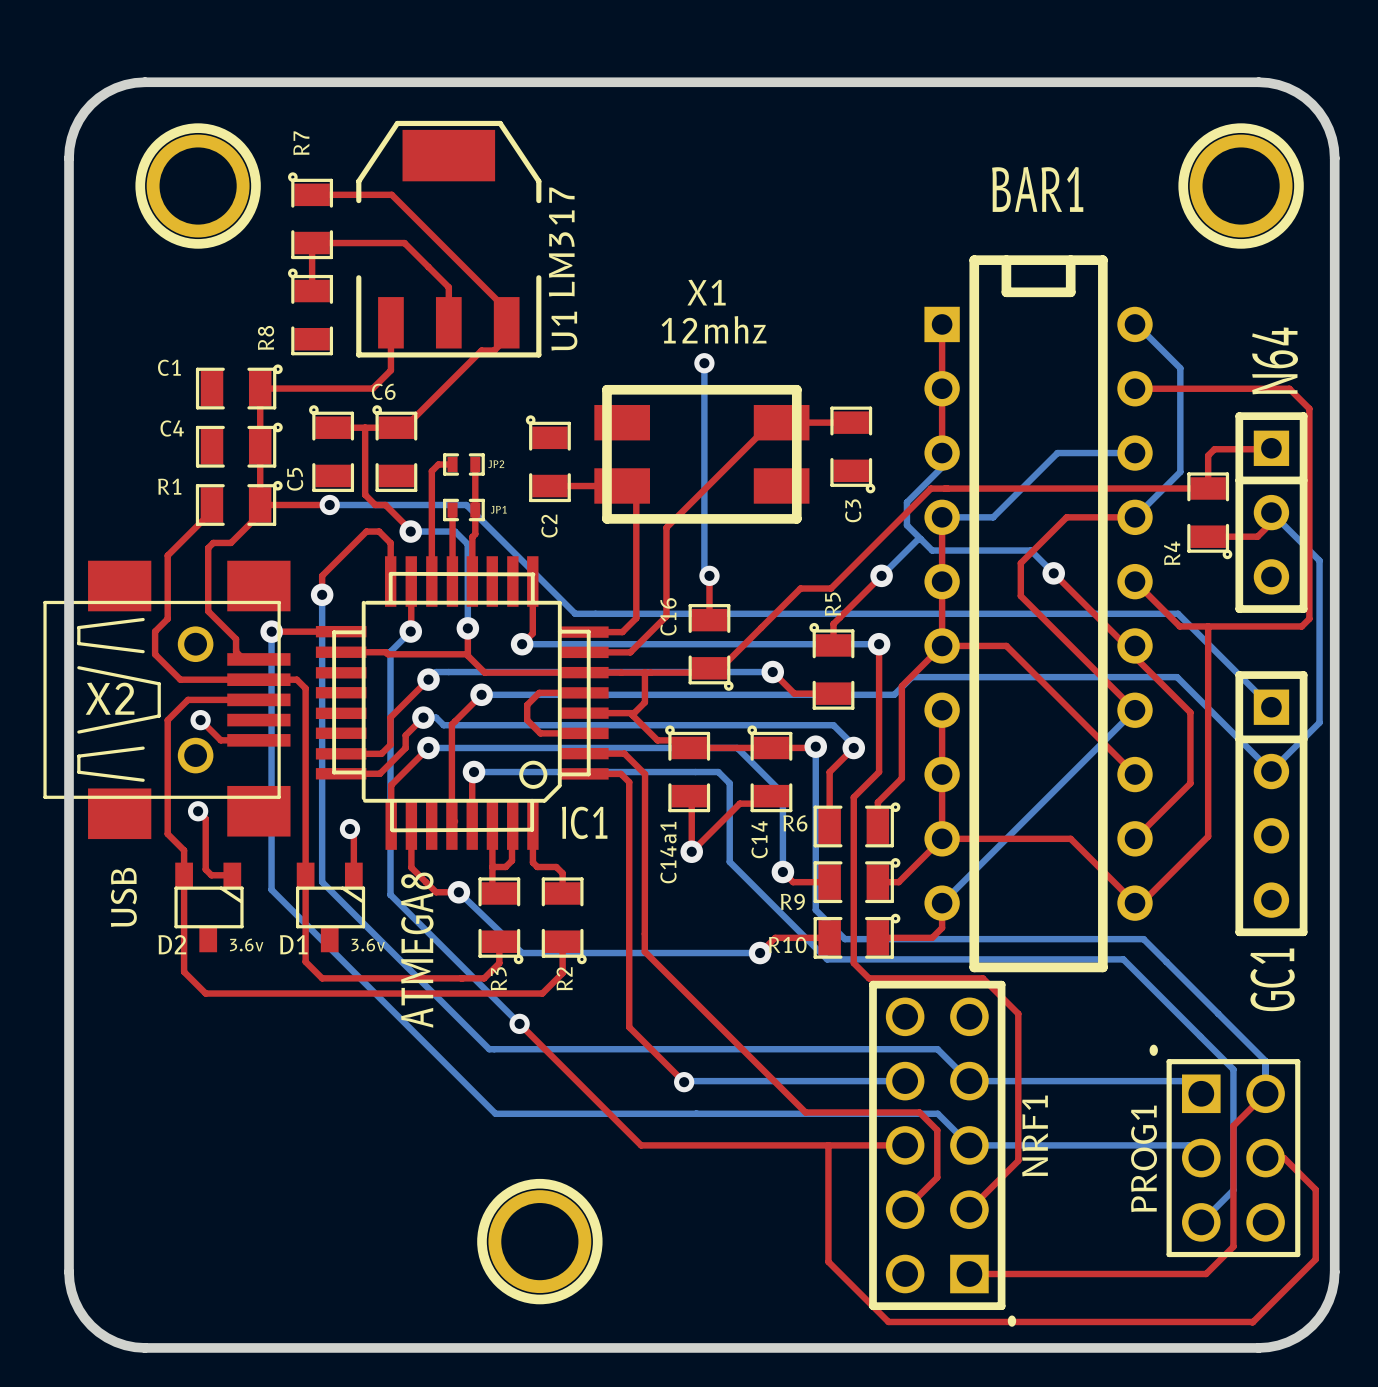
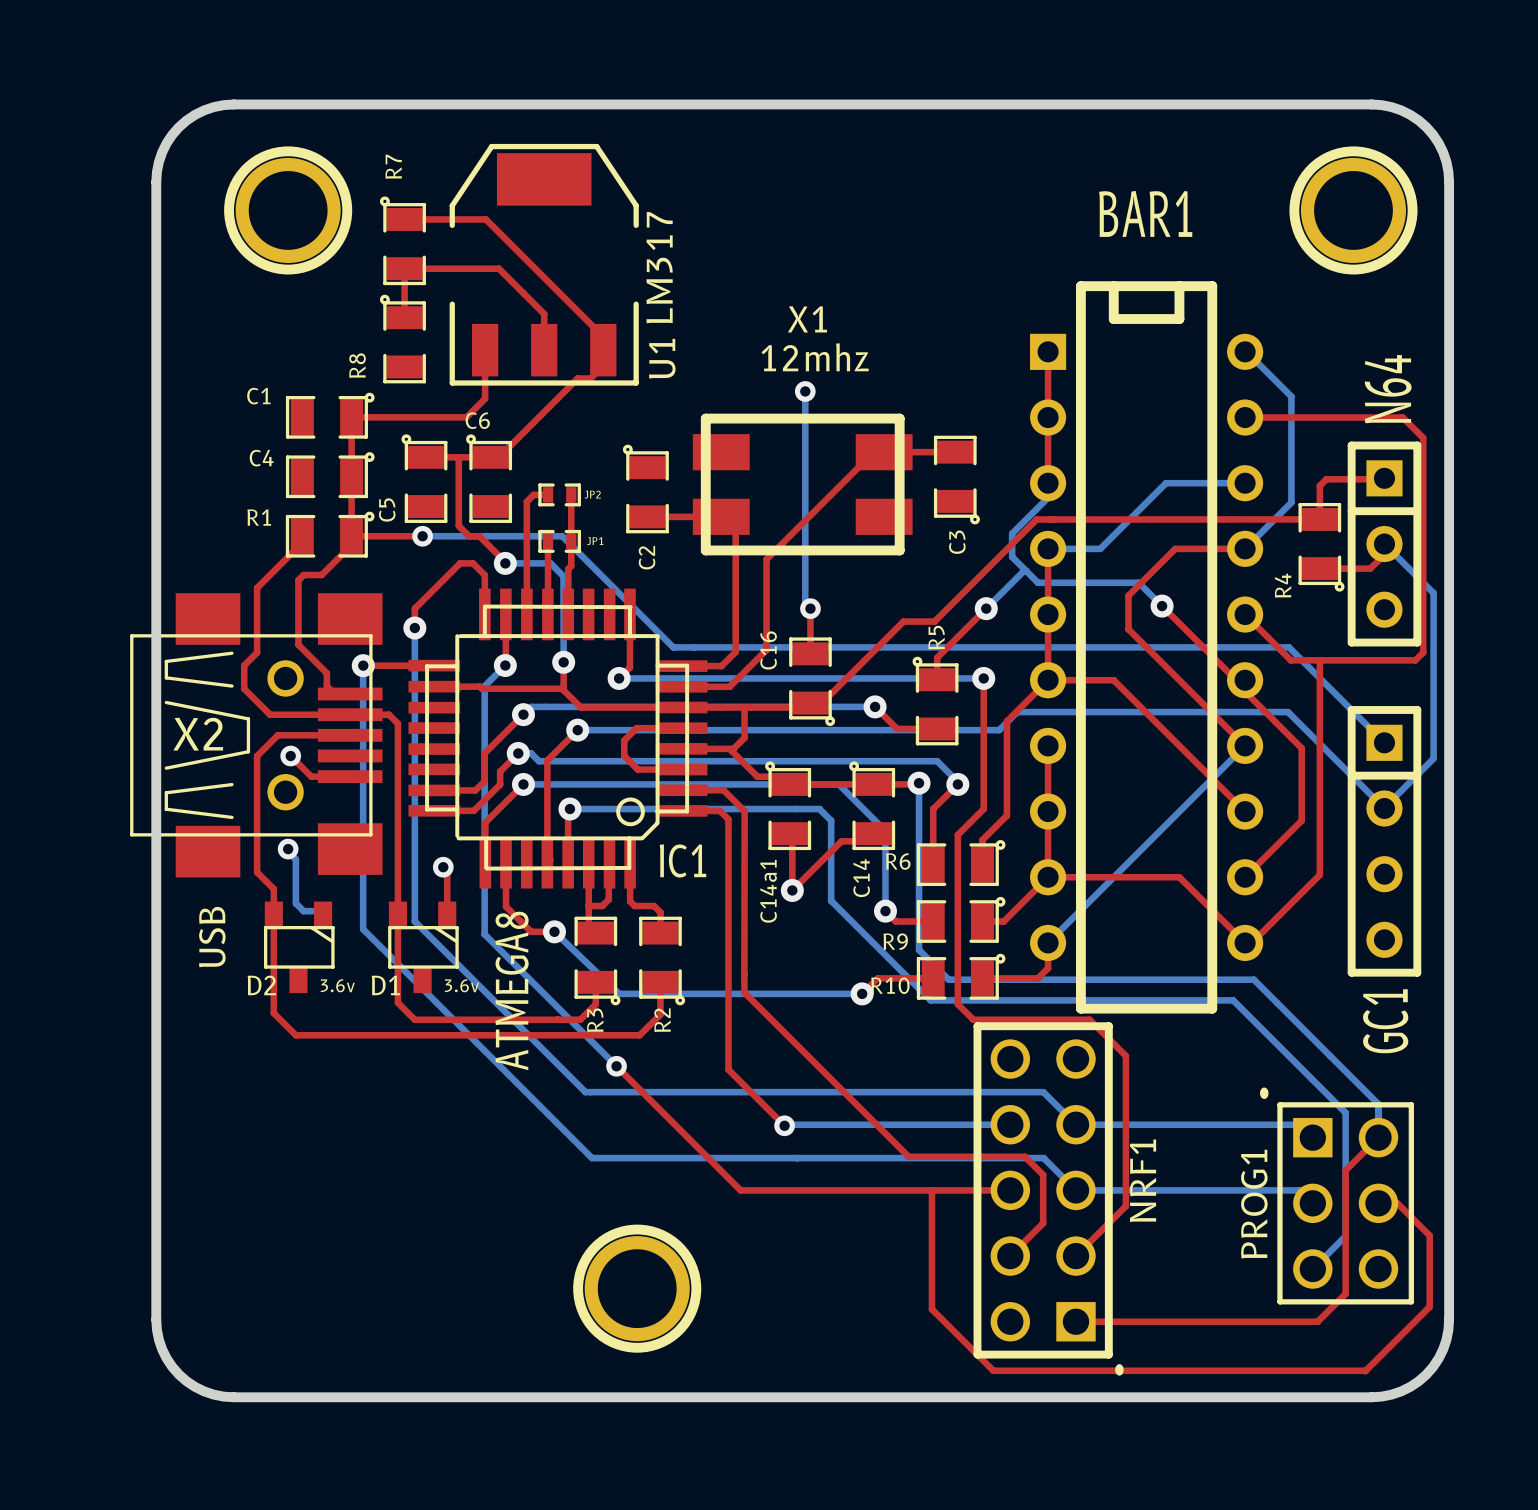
top track: (198, 811) (205, 818) (205, 869) (211, 875) (232, 875) -> none
bottom track: none -> (288, 851) (295, 859) (295, 903) (303, 911) (321, 911)

